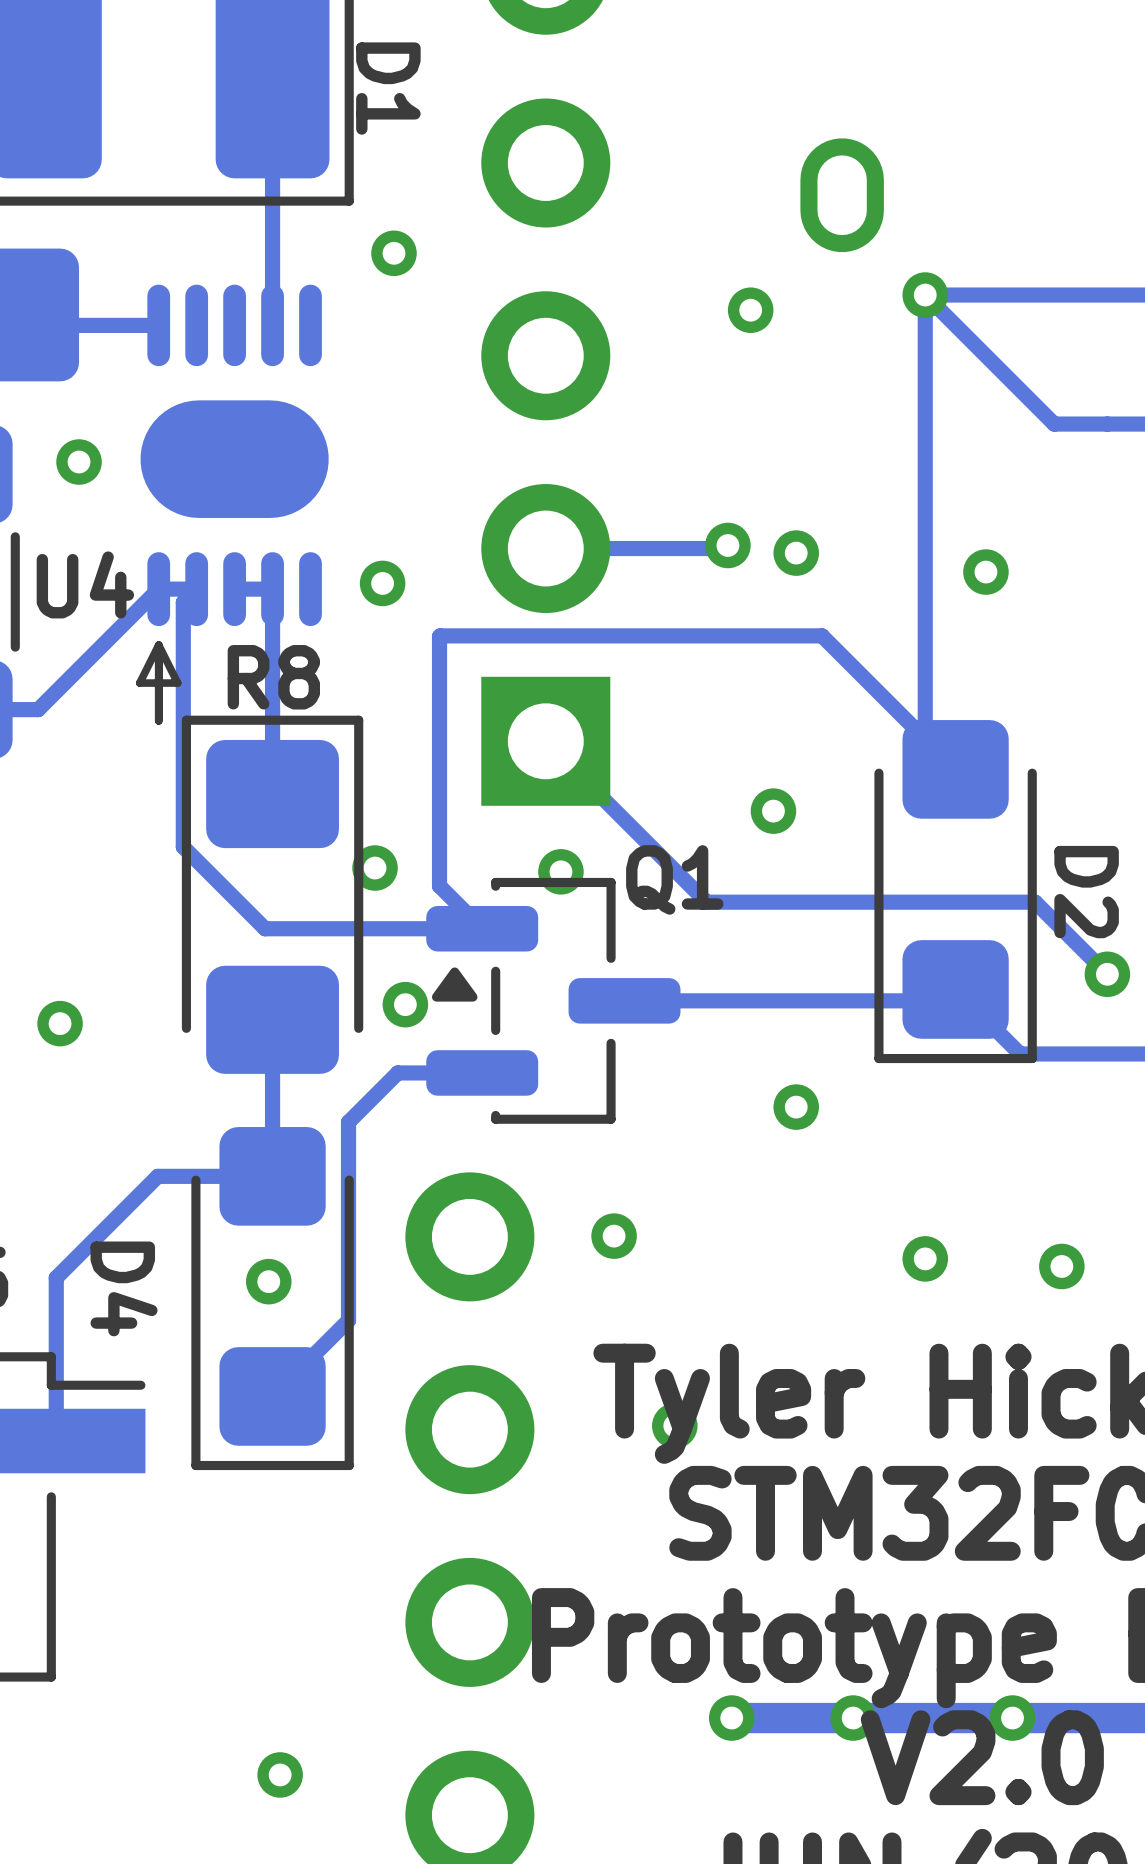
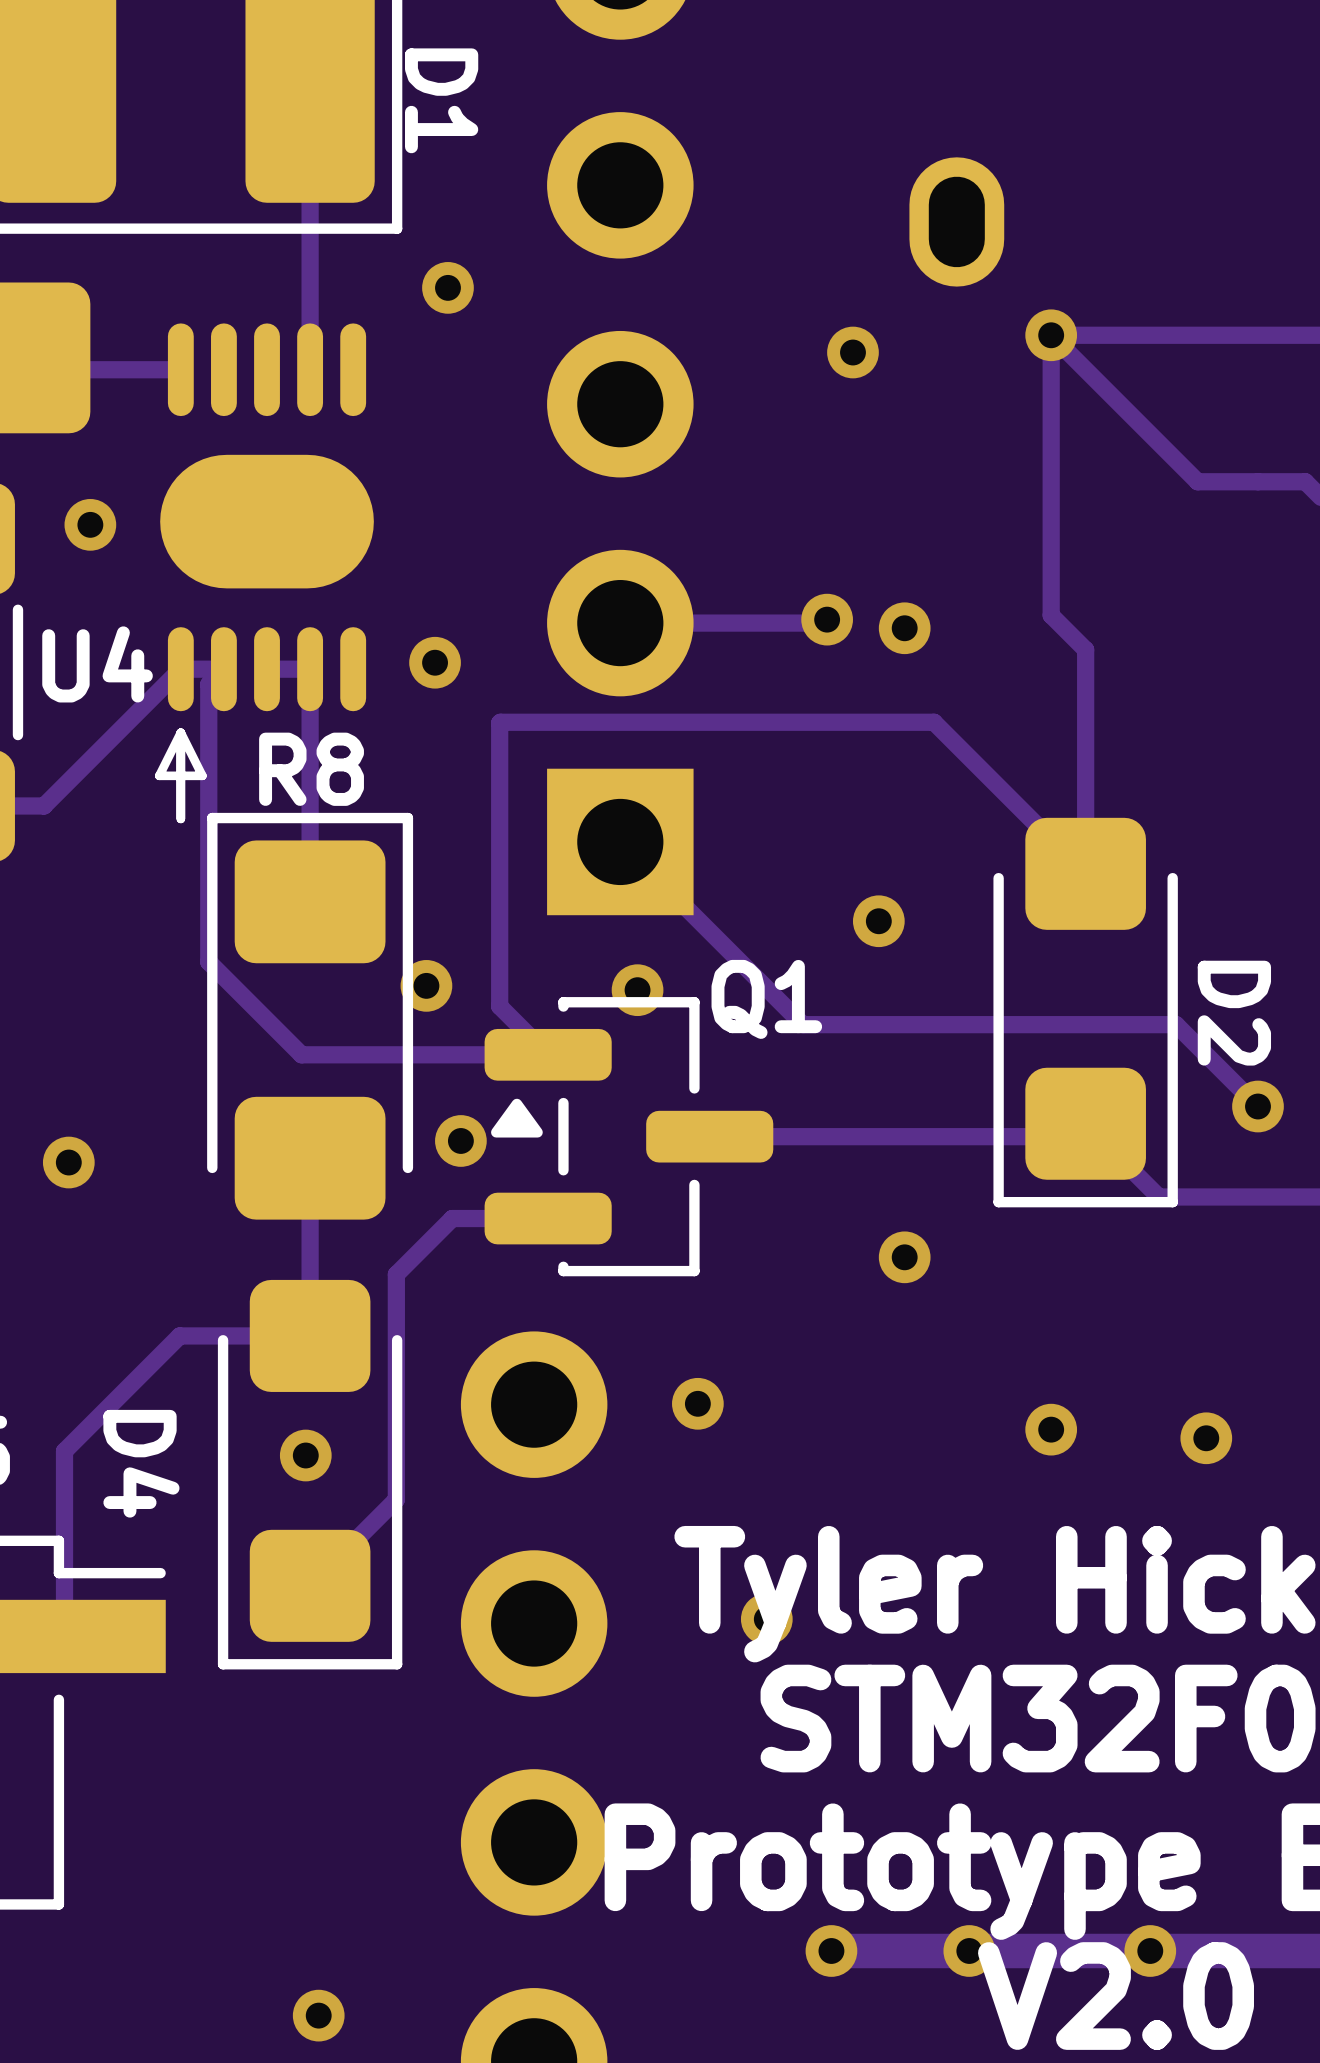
track: (925, 541) (925, 739) -> (1051, 615) (1085, 649) (1085, 873)
via: (985, 572) -> none

